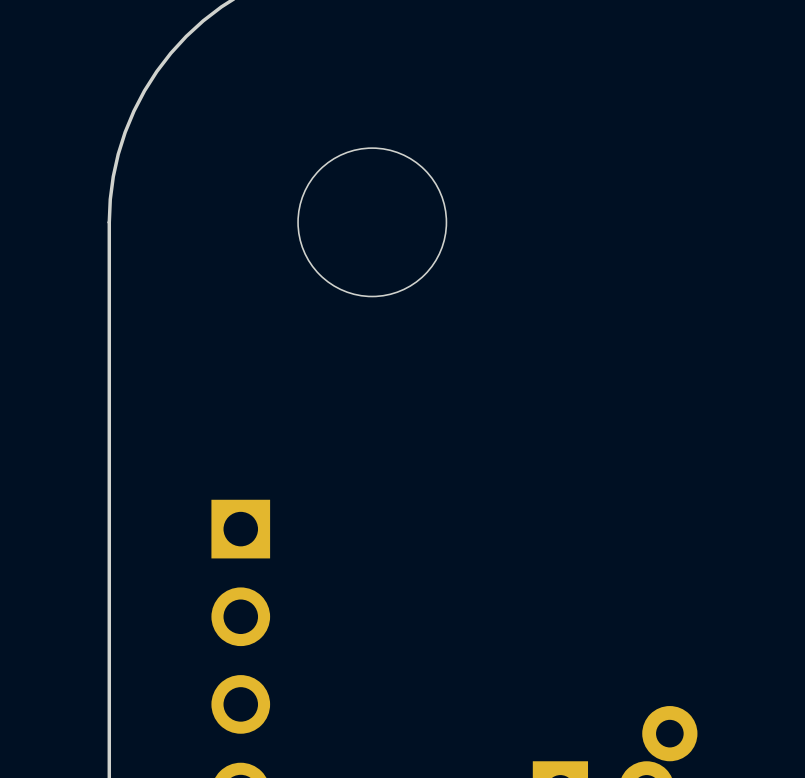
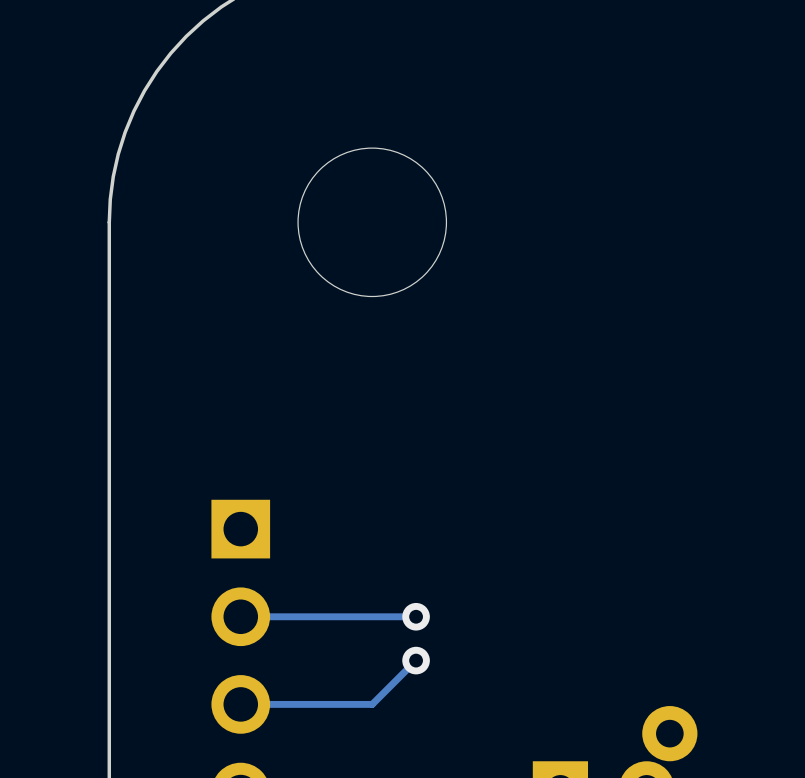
track: none -> (416, 616) (240, 616)
via: none -> (416, 616)
track: none -> (416, 660) (372, 704) (240, 704)
via: none -> (416, 660)

